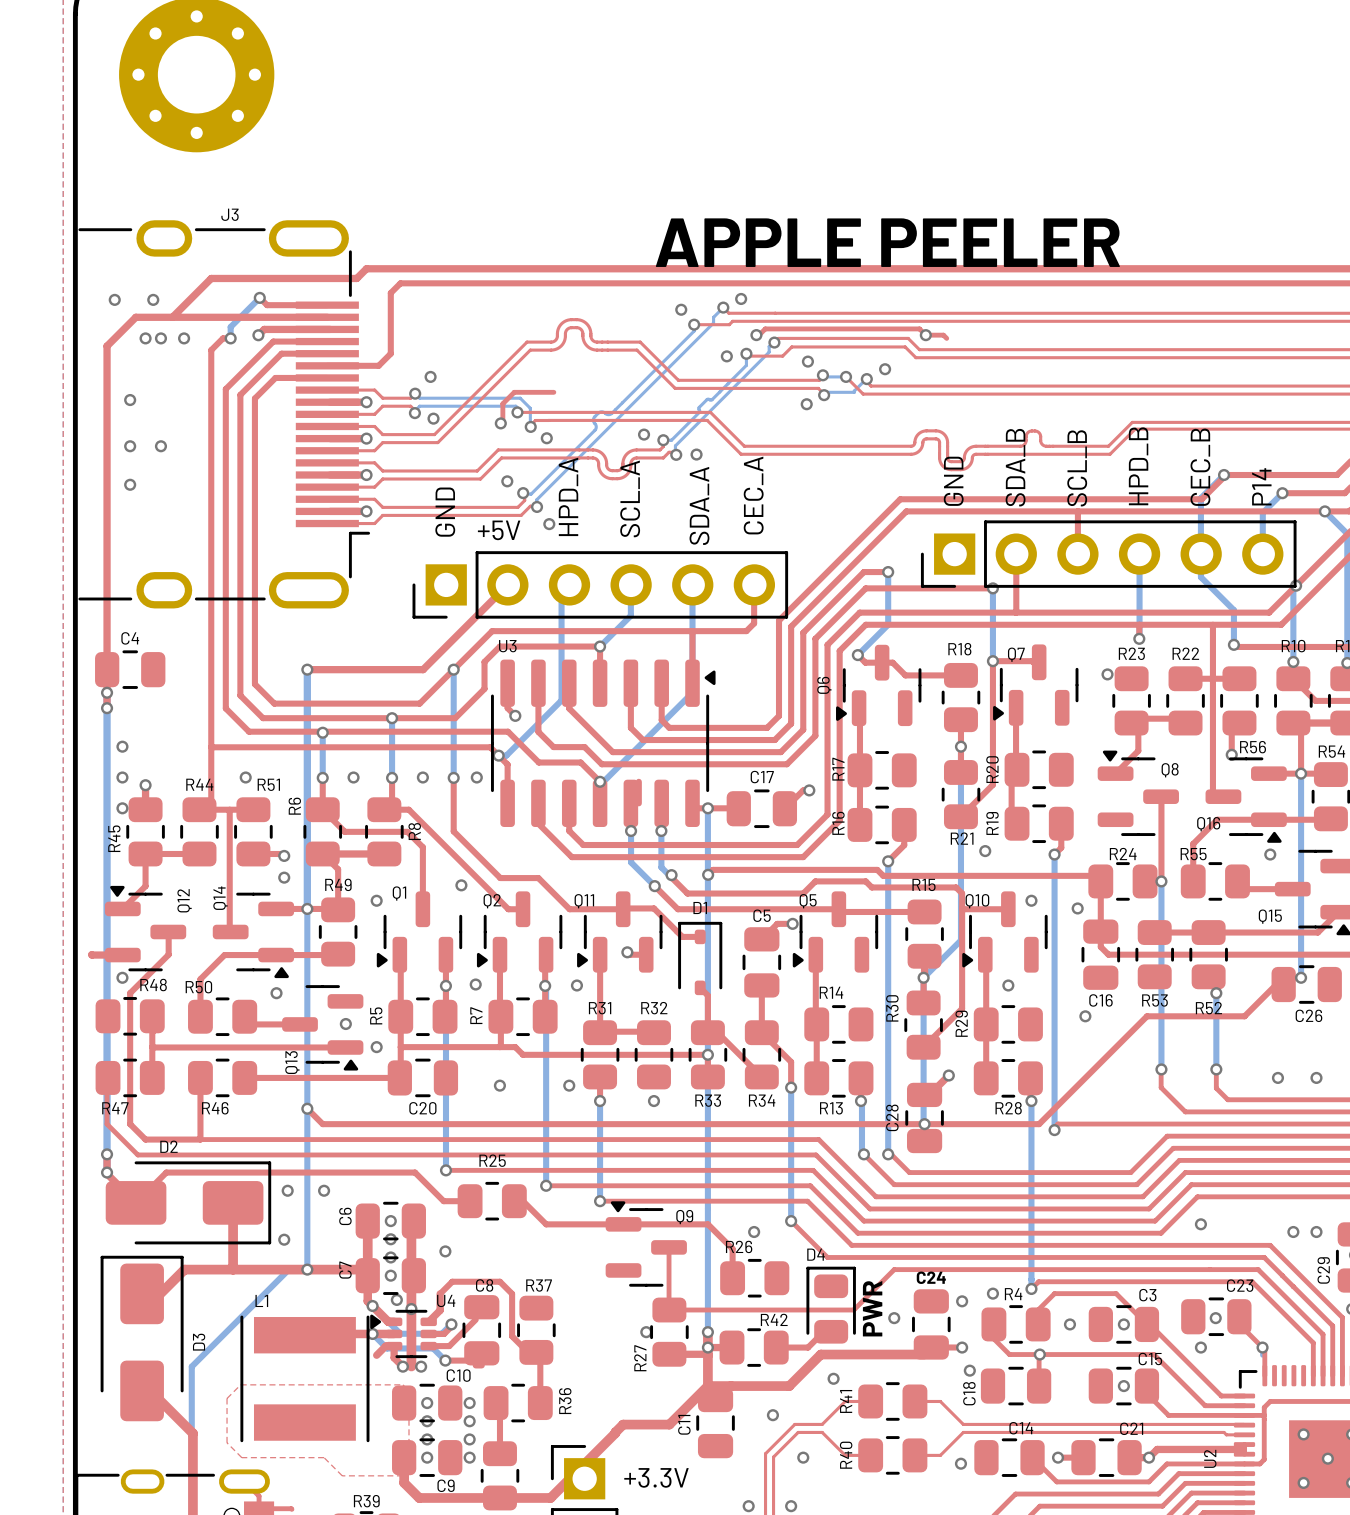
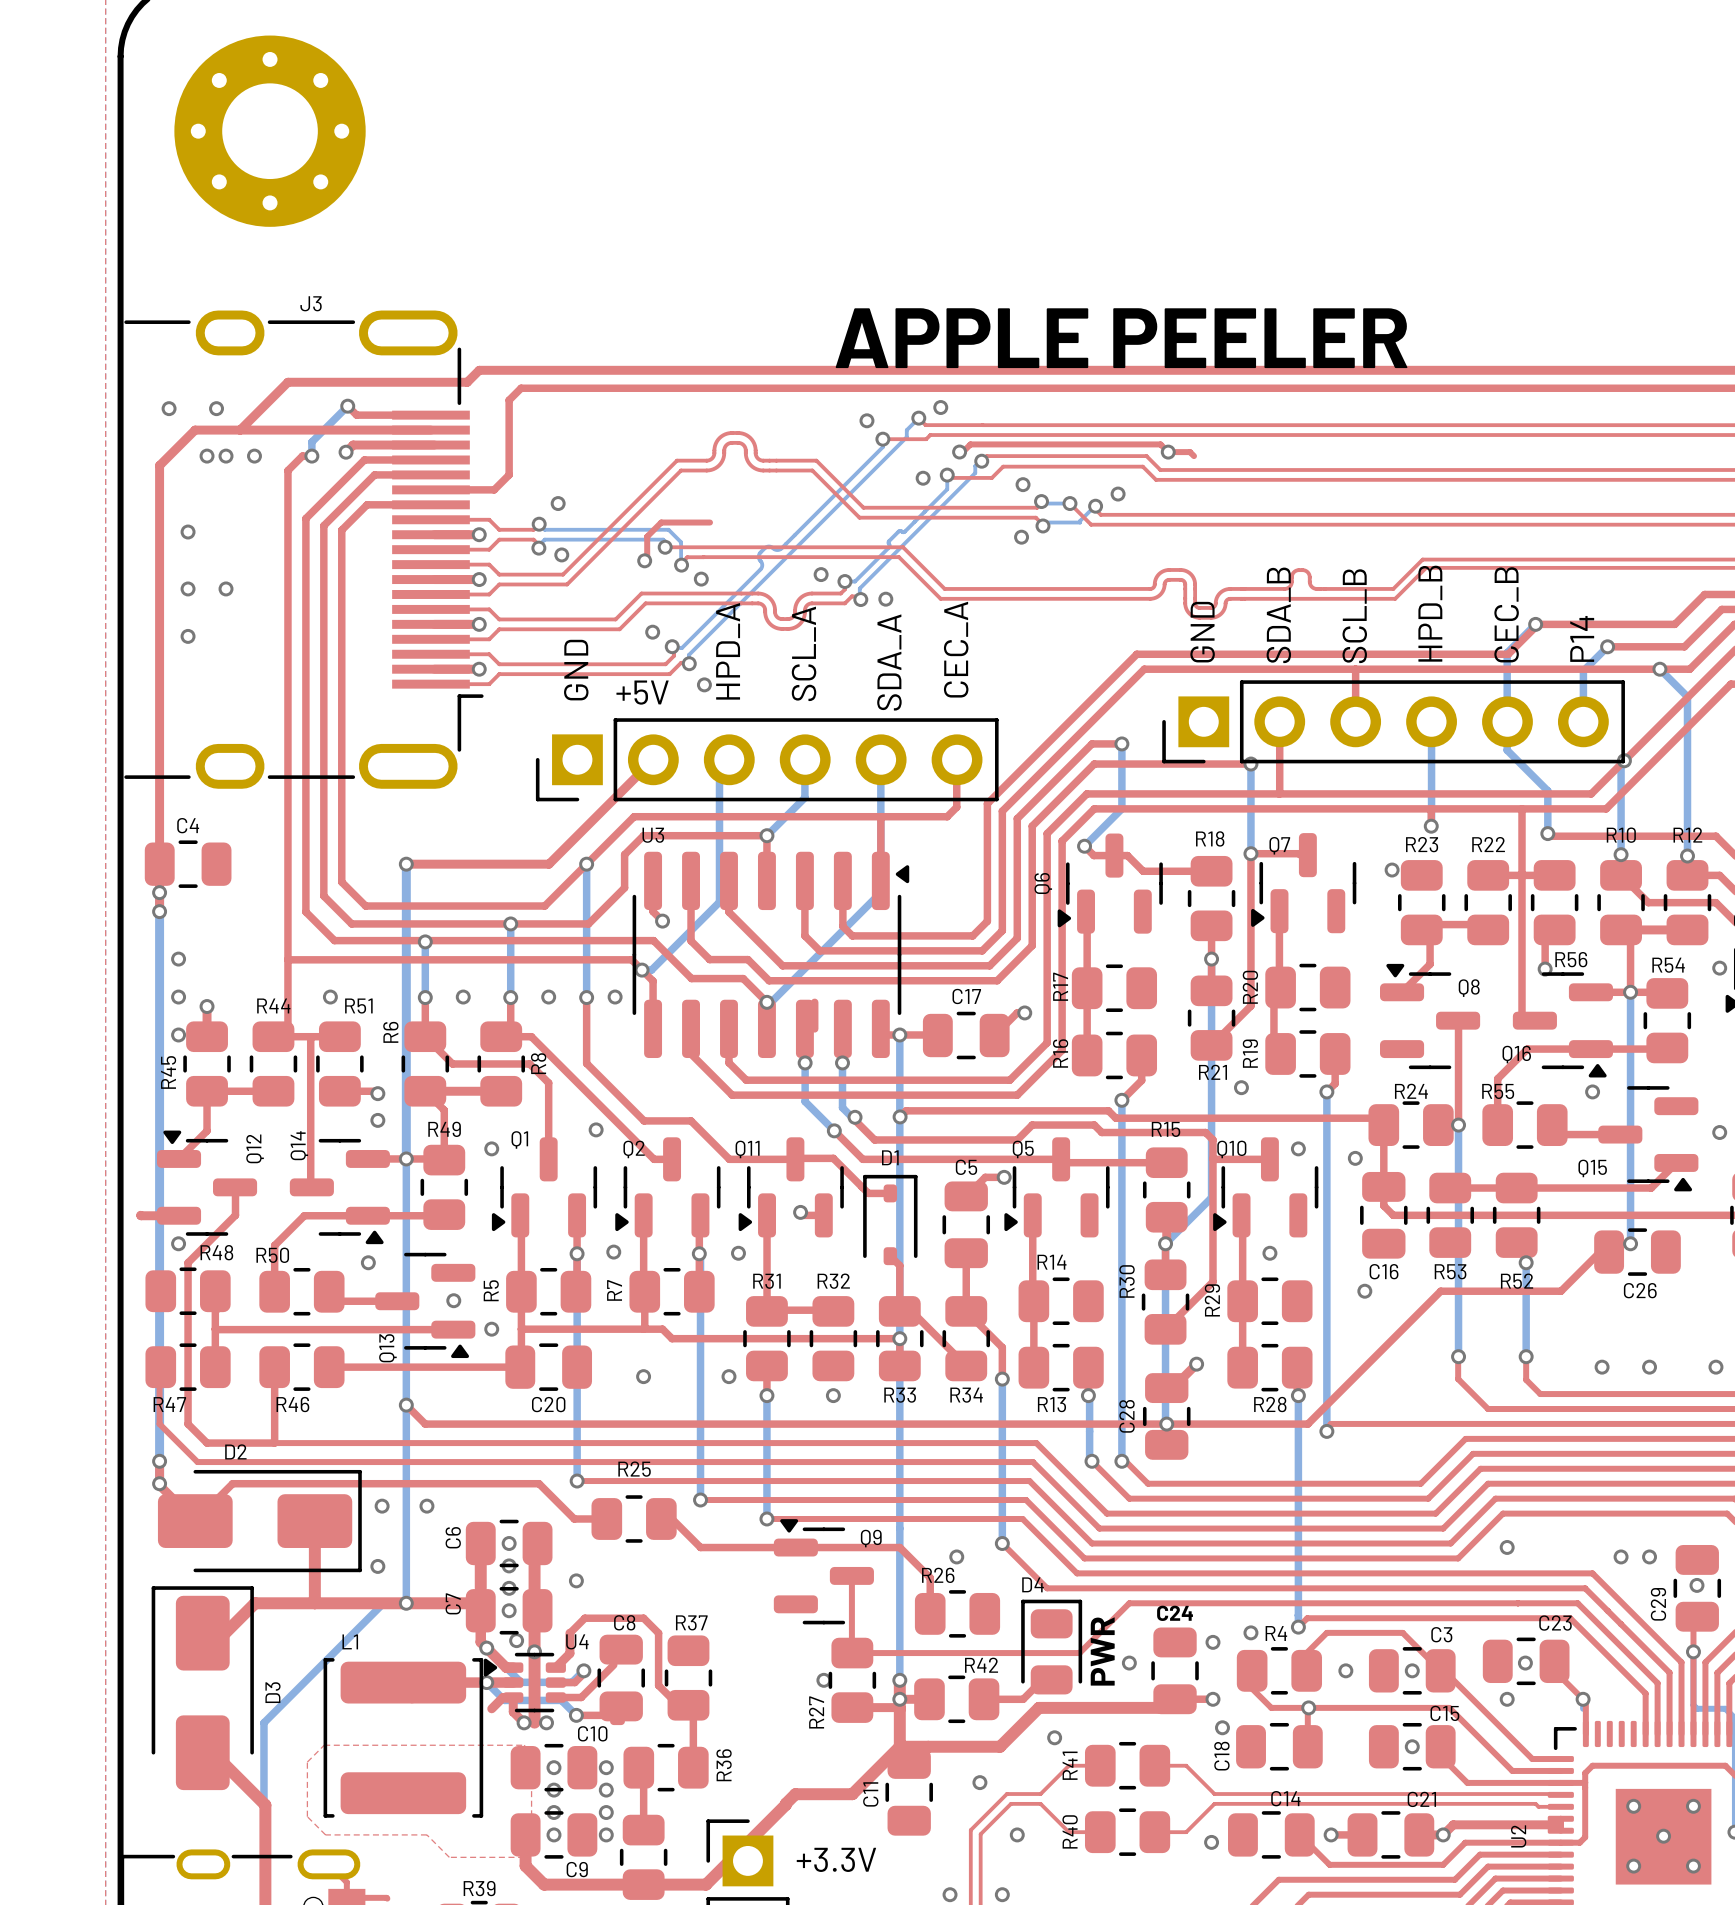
L1 footprint: [240, 1315, 370, 1443] -> [323, 1658, 484, 1818]

